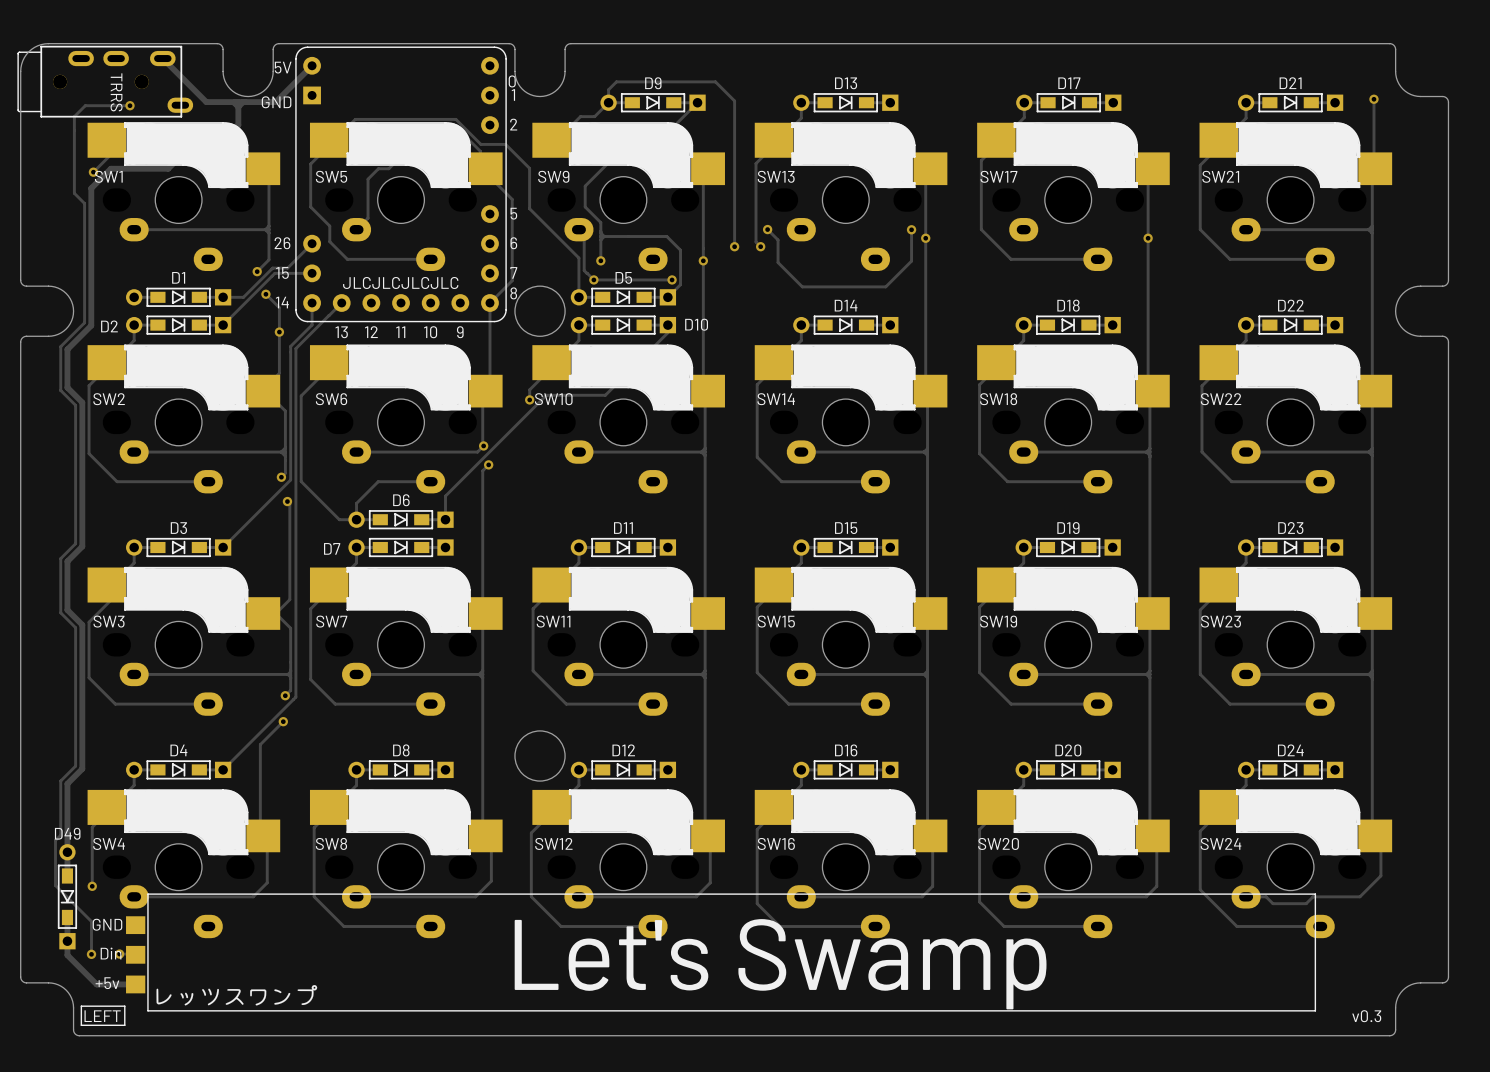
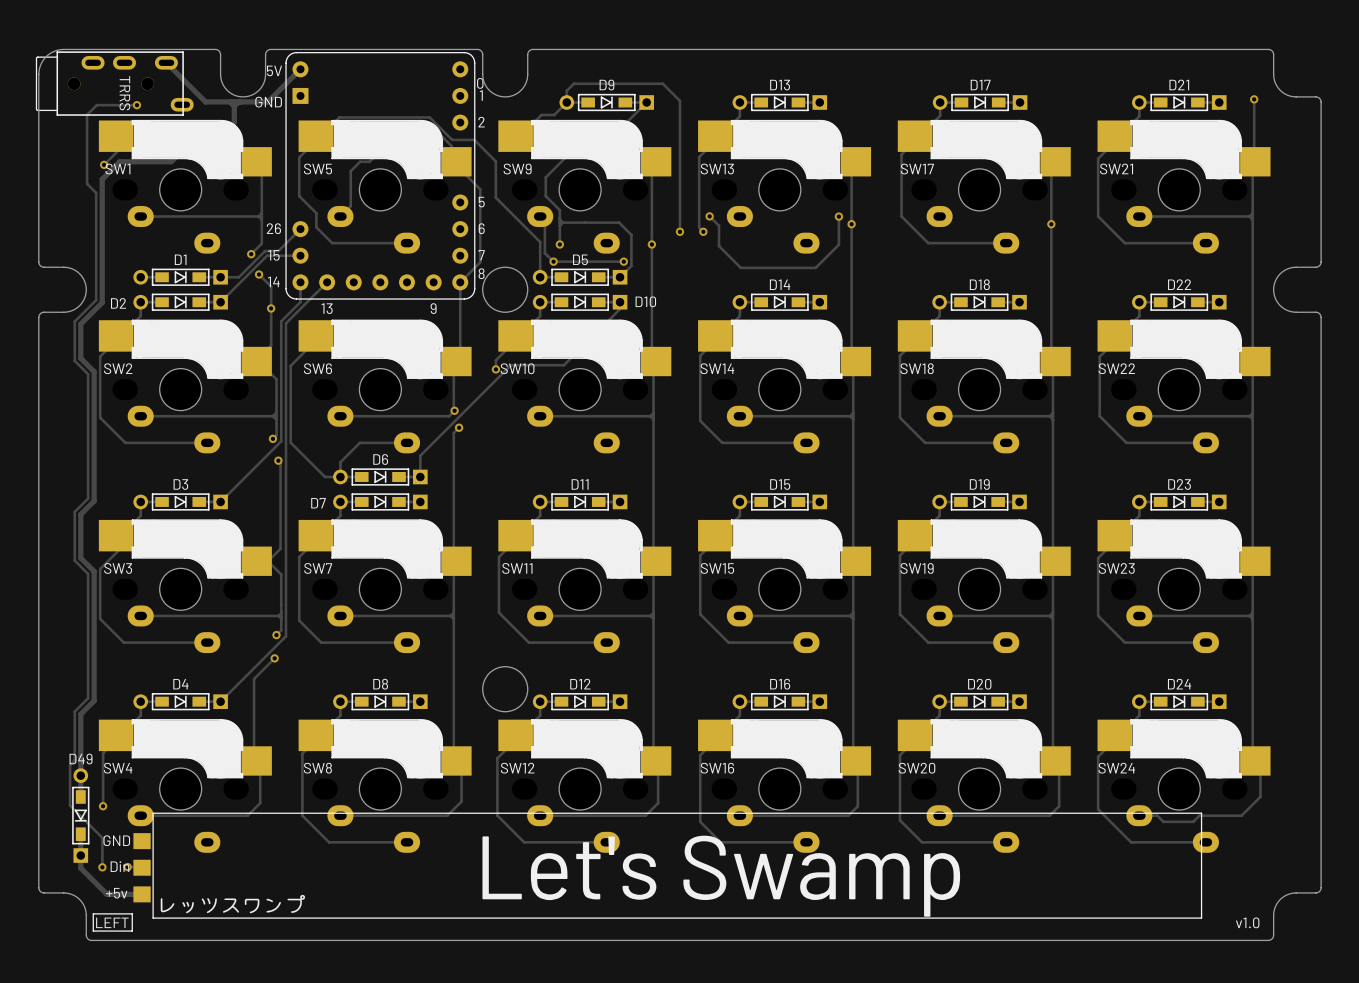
text: JLCJLCJLCJLC (400, 282) -> none
part text: 12 (371, 332) -> none
part text: 11 (400, 332) -> none
part text: 10 (430, 332) -> none
text: v0.3 (1366, 1016) -> v1.0 (1247, 922)

